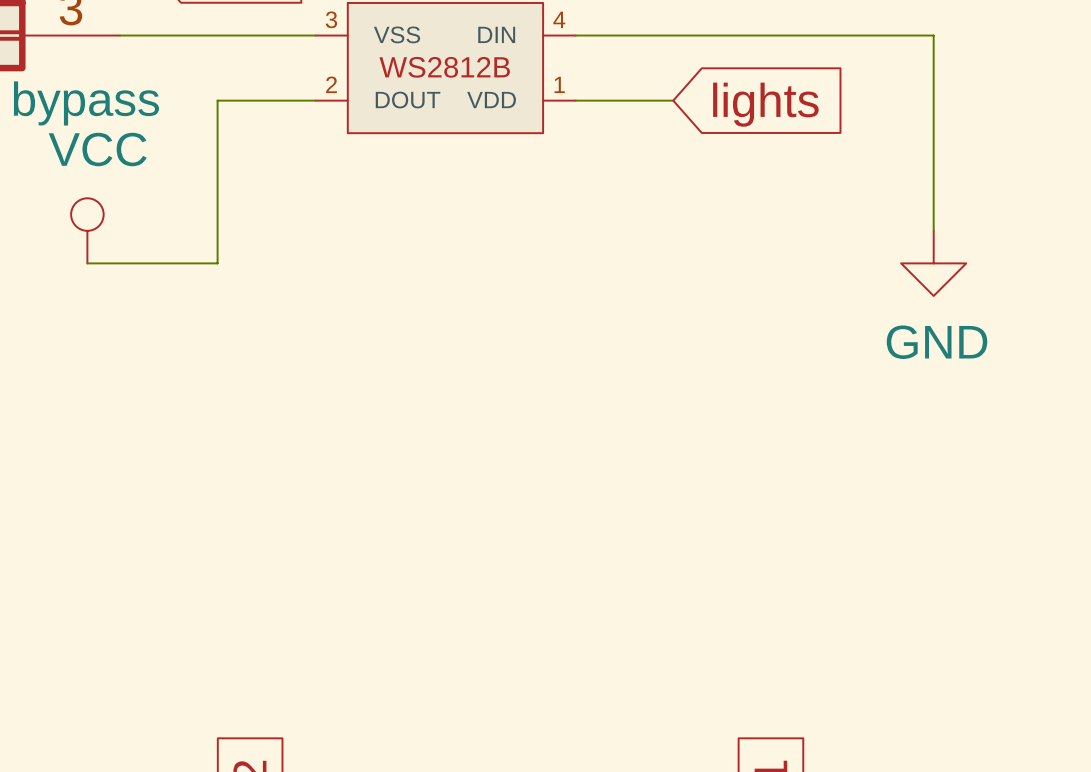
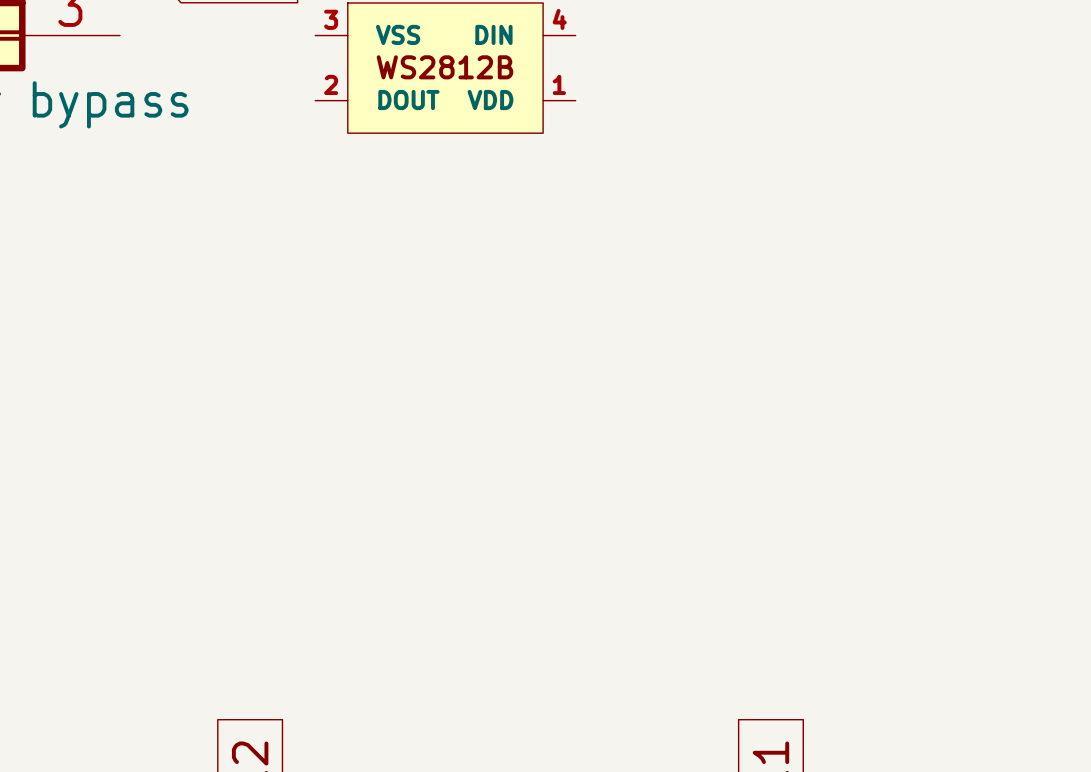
wire: (119, 35) (315, 35) -> none
wire: (575, 35) (933, 35) (933, 230) -> none
wire: (315, 100) (217, 100) (217, 263) (87, 263) -> none
wire: (575, 100) (673, 100) -> none
global label: lights (765, 104) -> none
power symbol: VCC (87, 230) -> none
power symbol: GND (933, 263) -> none

